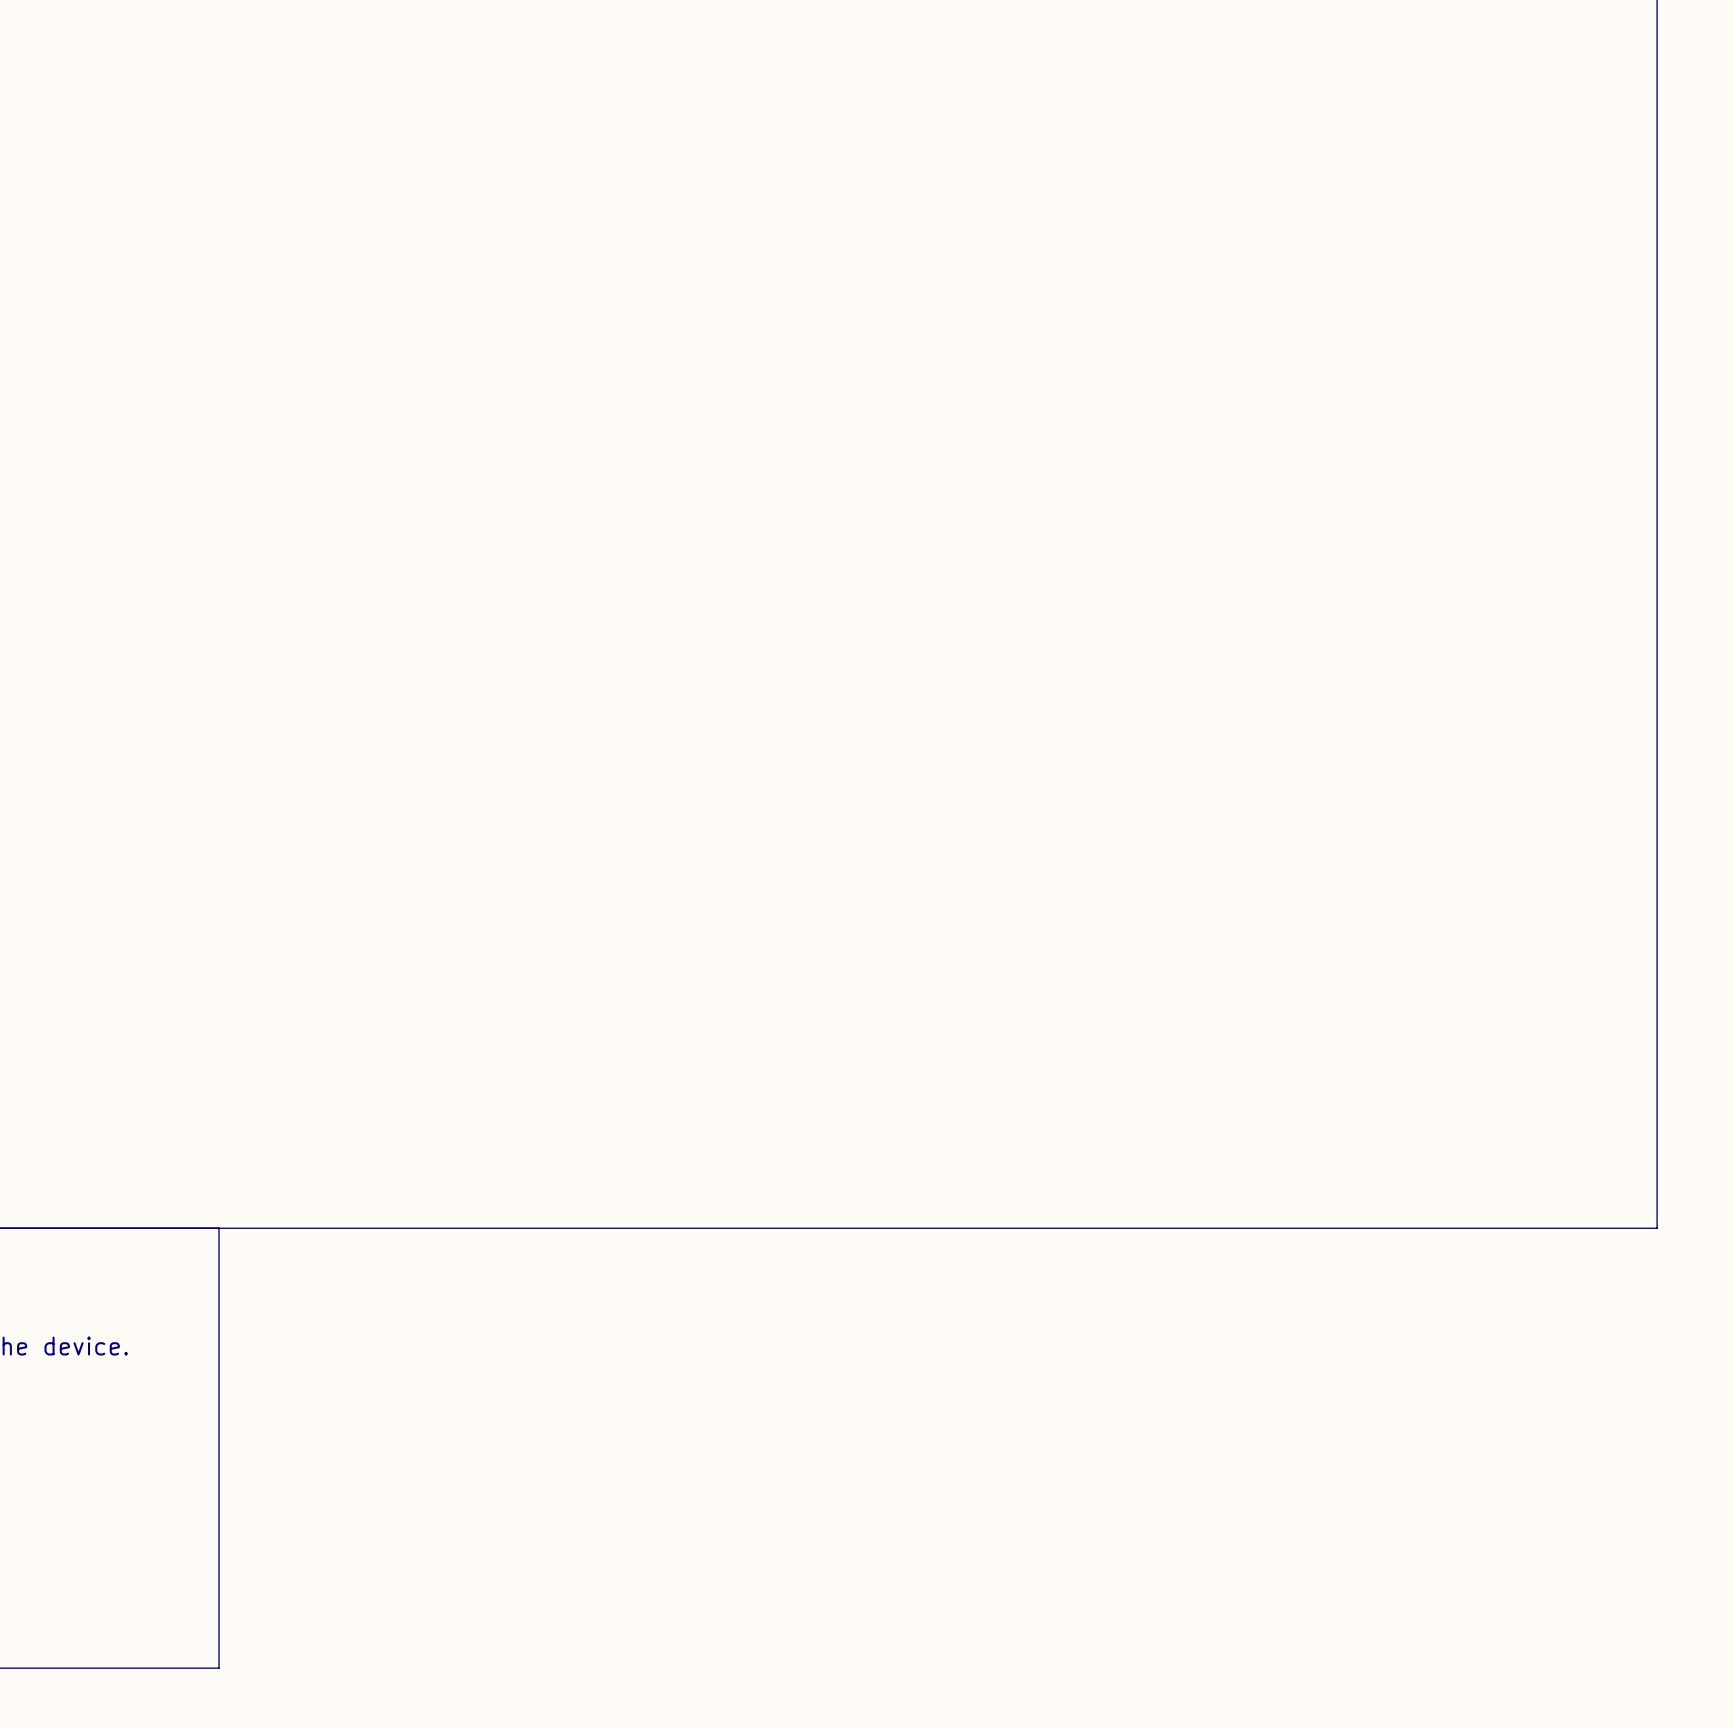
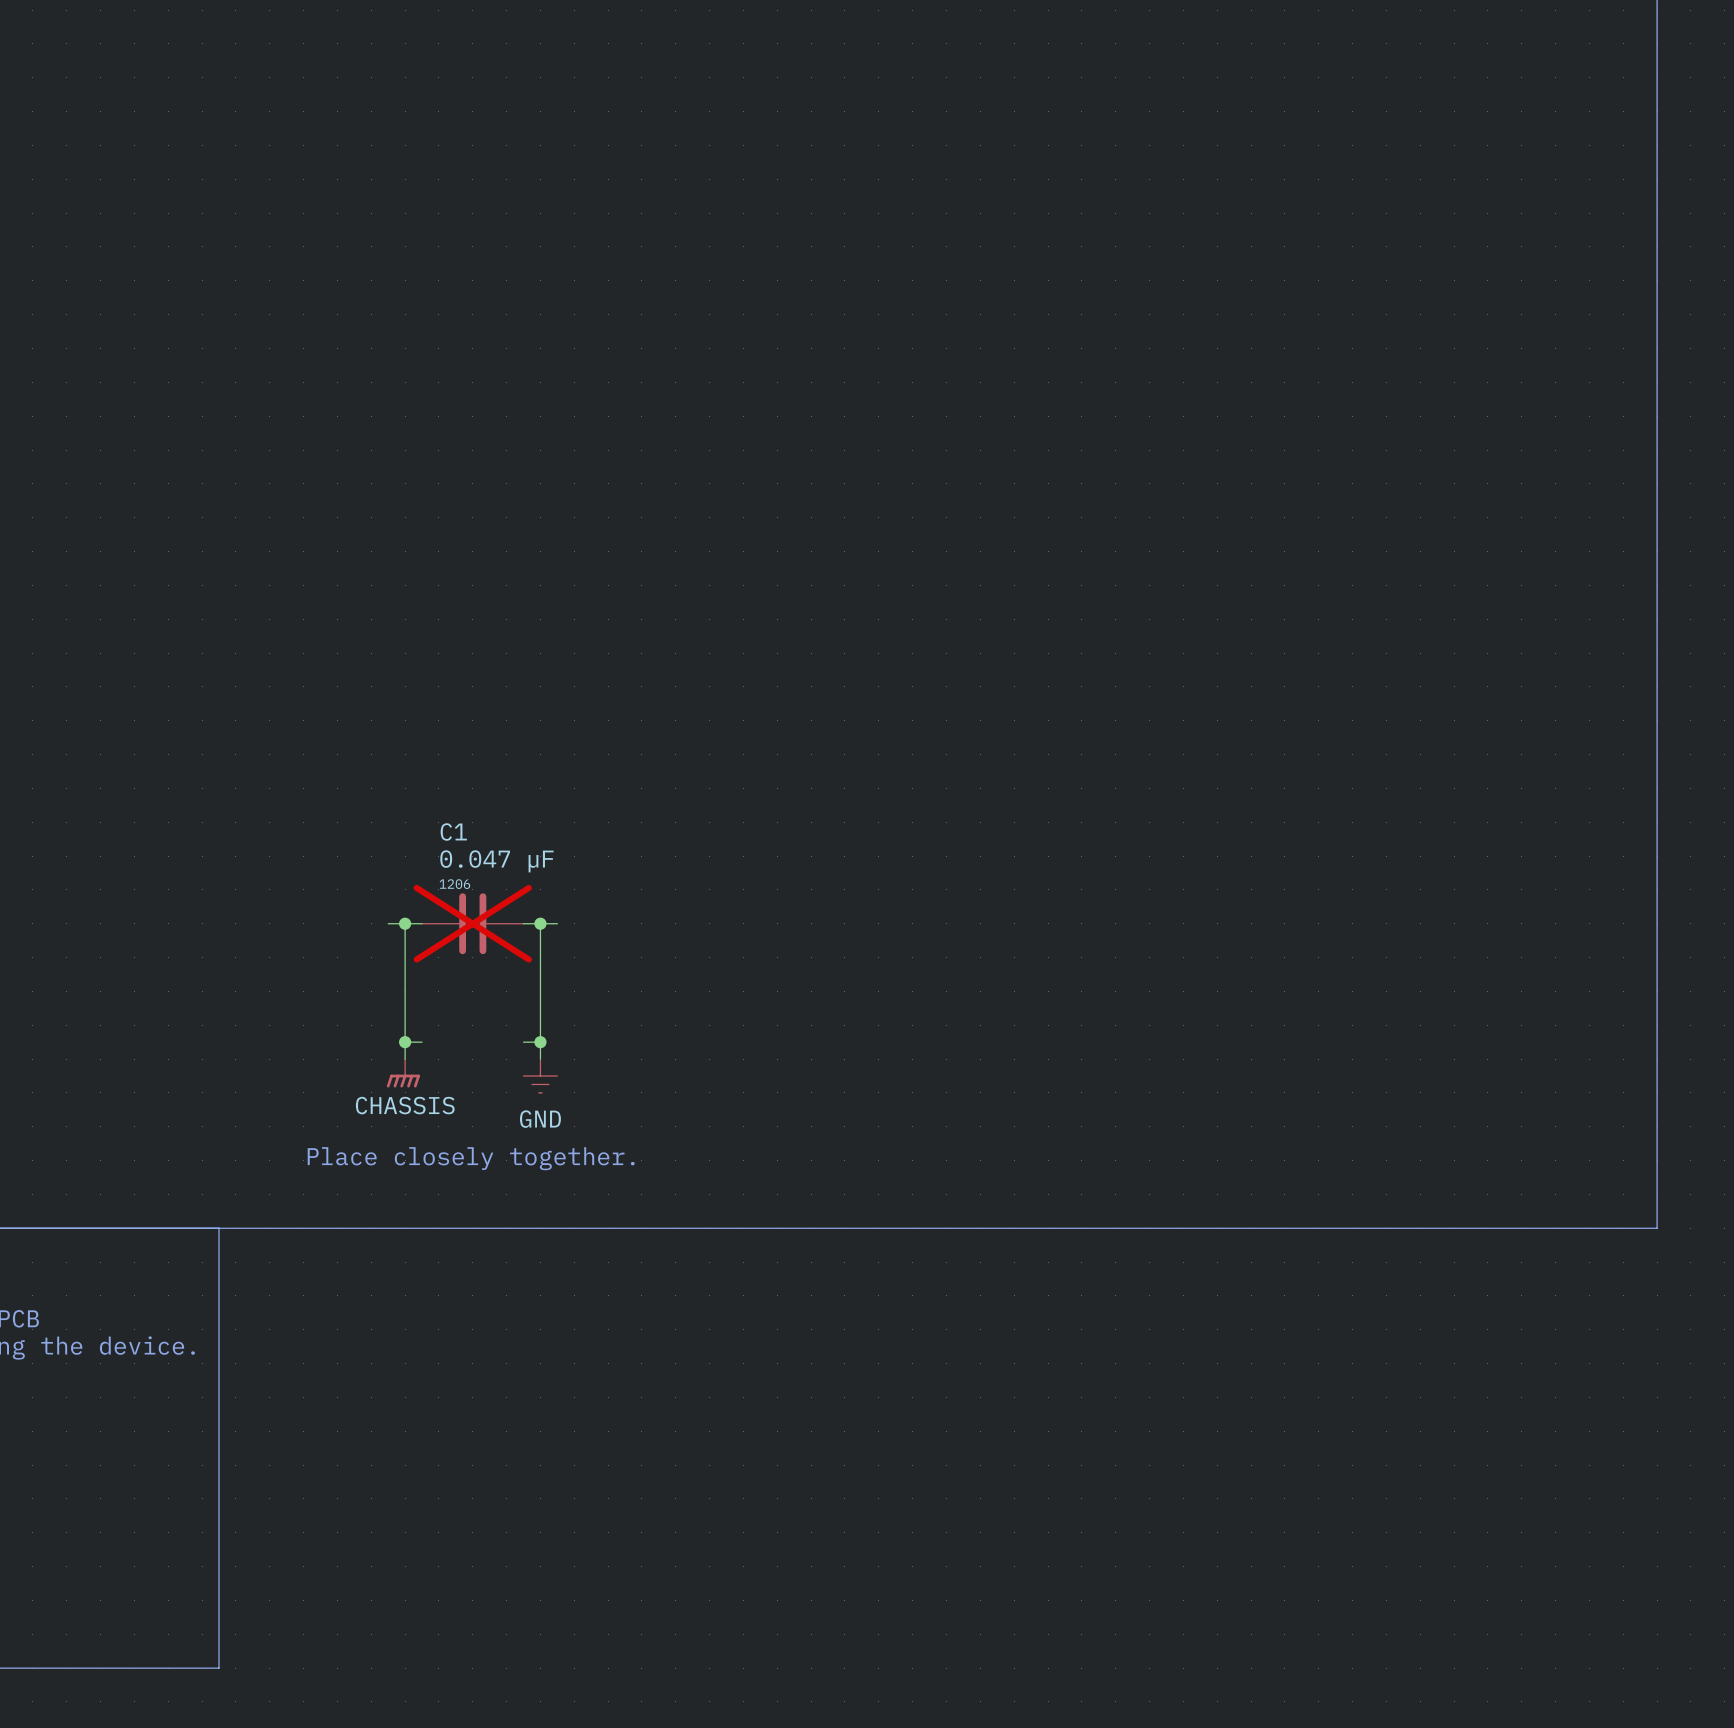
wire: none -> (388, 923) (422, 923)
wire: none -> (405, 923) (405, 1059)
junction: none -> (405, 923)
C1: none -> 0.047 µF (472, 923)
wire: none -> (523, 923) (557, 923)
wire: none -> (540, 923) (540, 1059)
junction: none -> (540, 923)
wire: none -> (405, 1042) (422, 1042)
junction: none -> (405, 1042)
wire: none -> (523, 1042) (540, 1042)
junction: none -> (540, 1042)
power symbol: none -> CHASSIS (403, 1073)
power symbol: none -> GND (540, 1076)
text: none -> Place closely together. (471, 1158)

